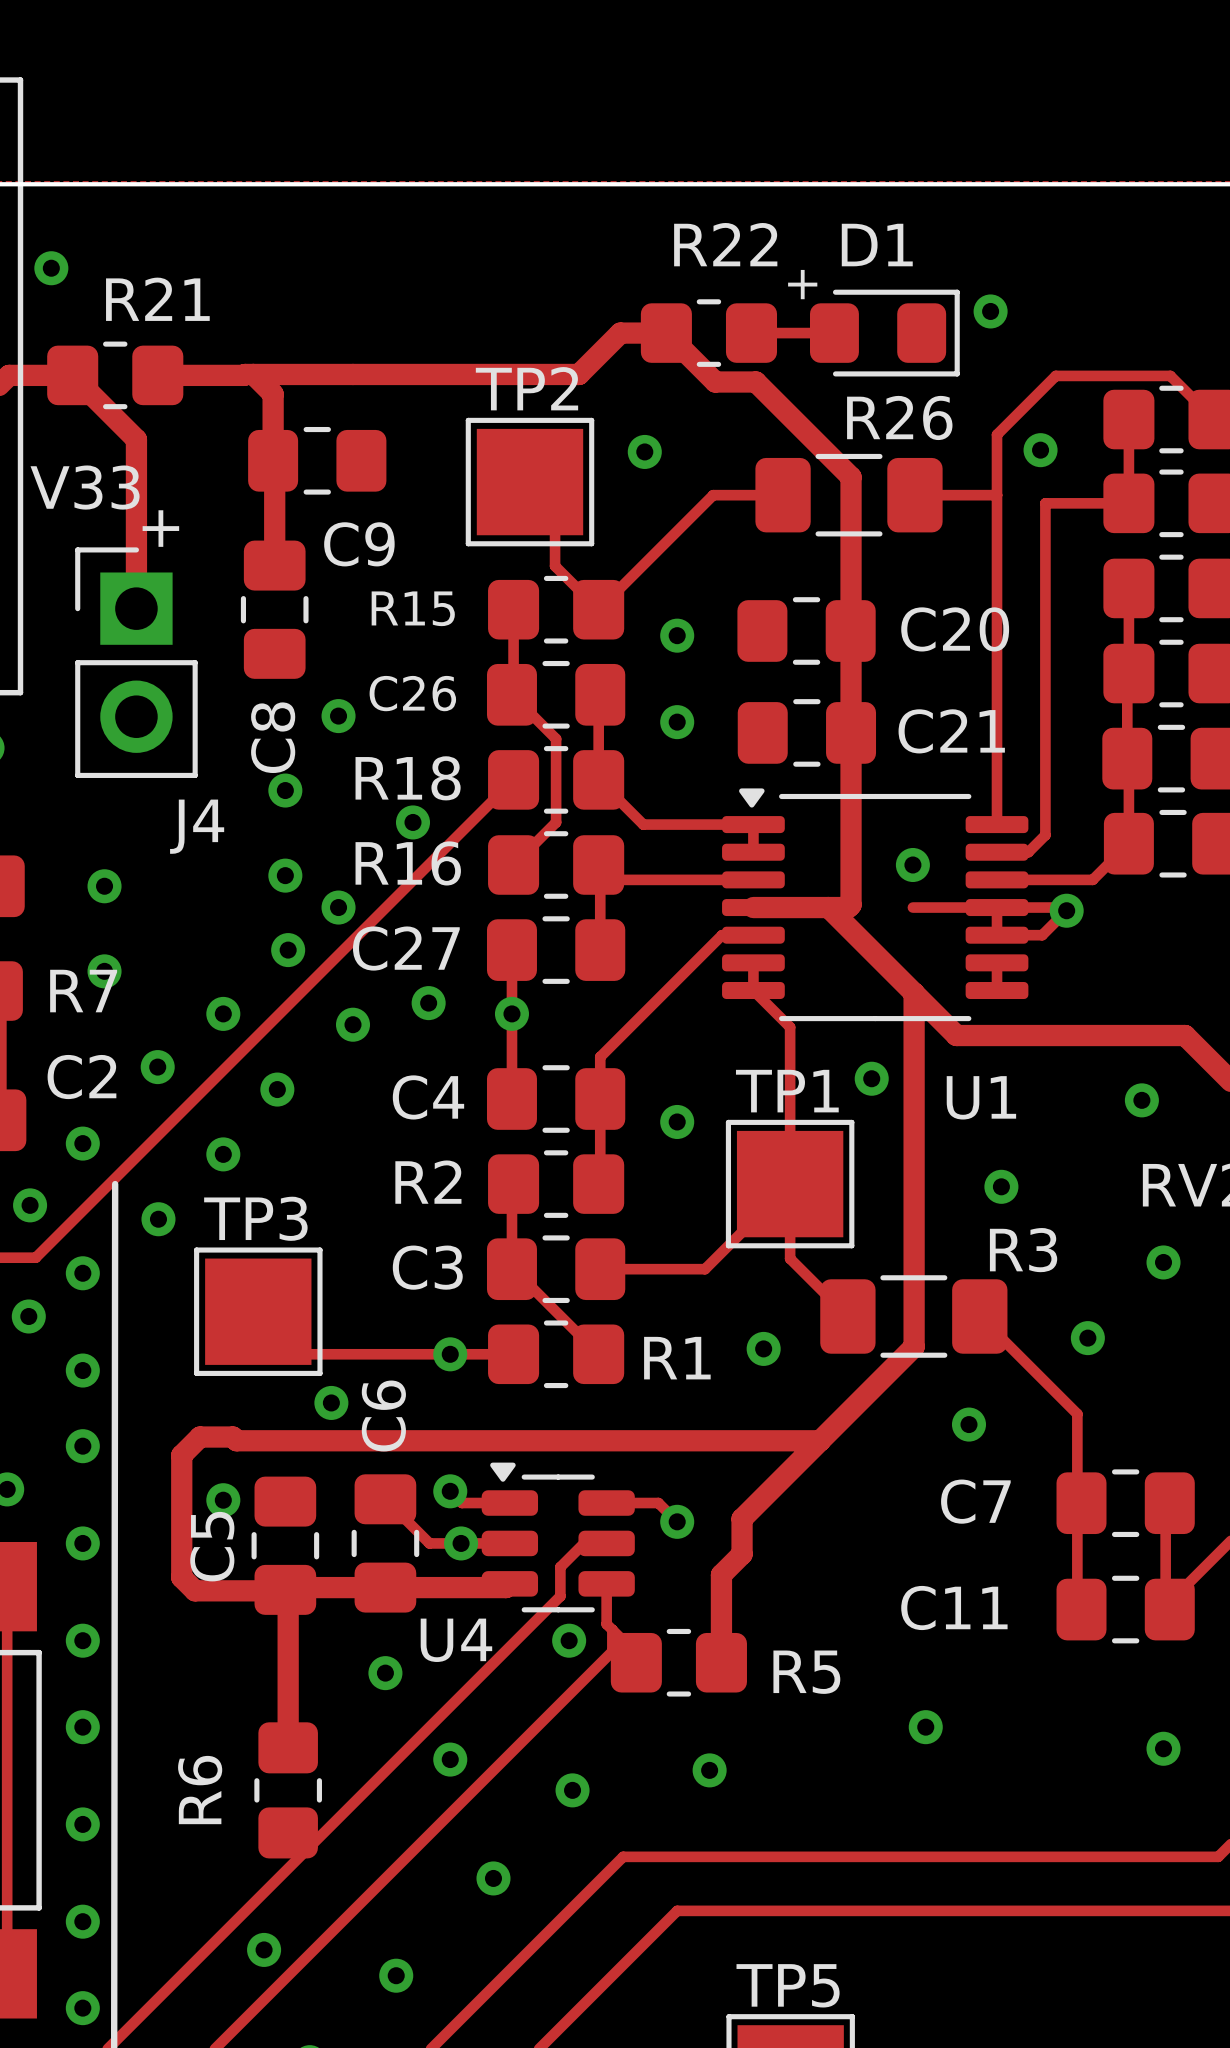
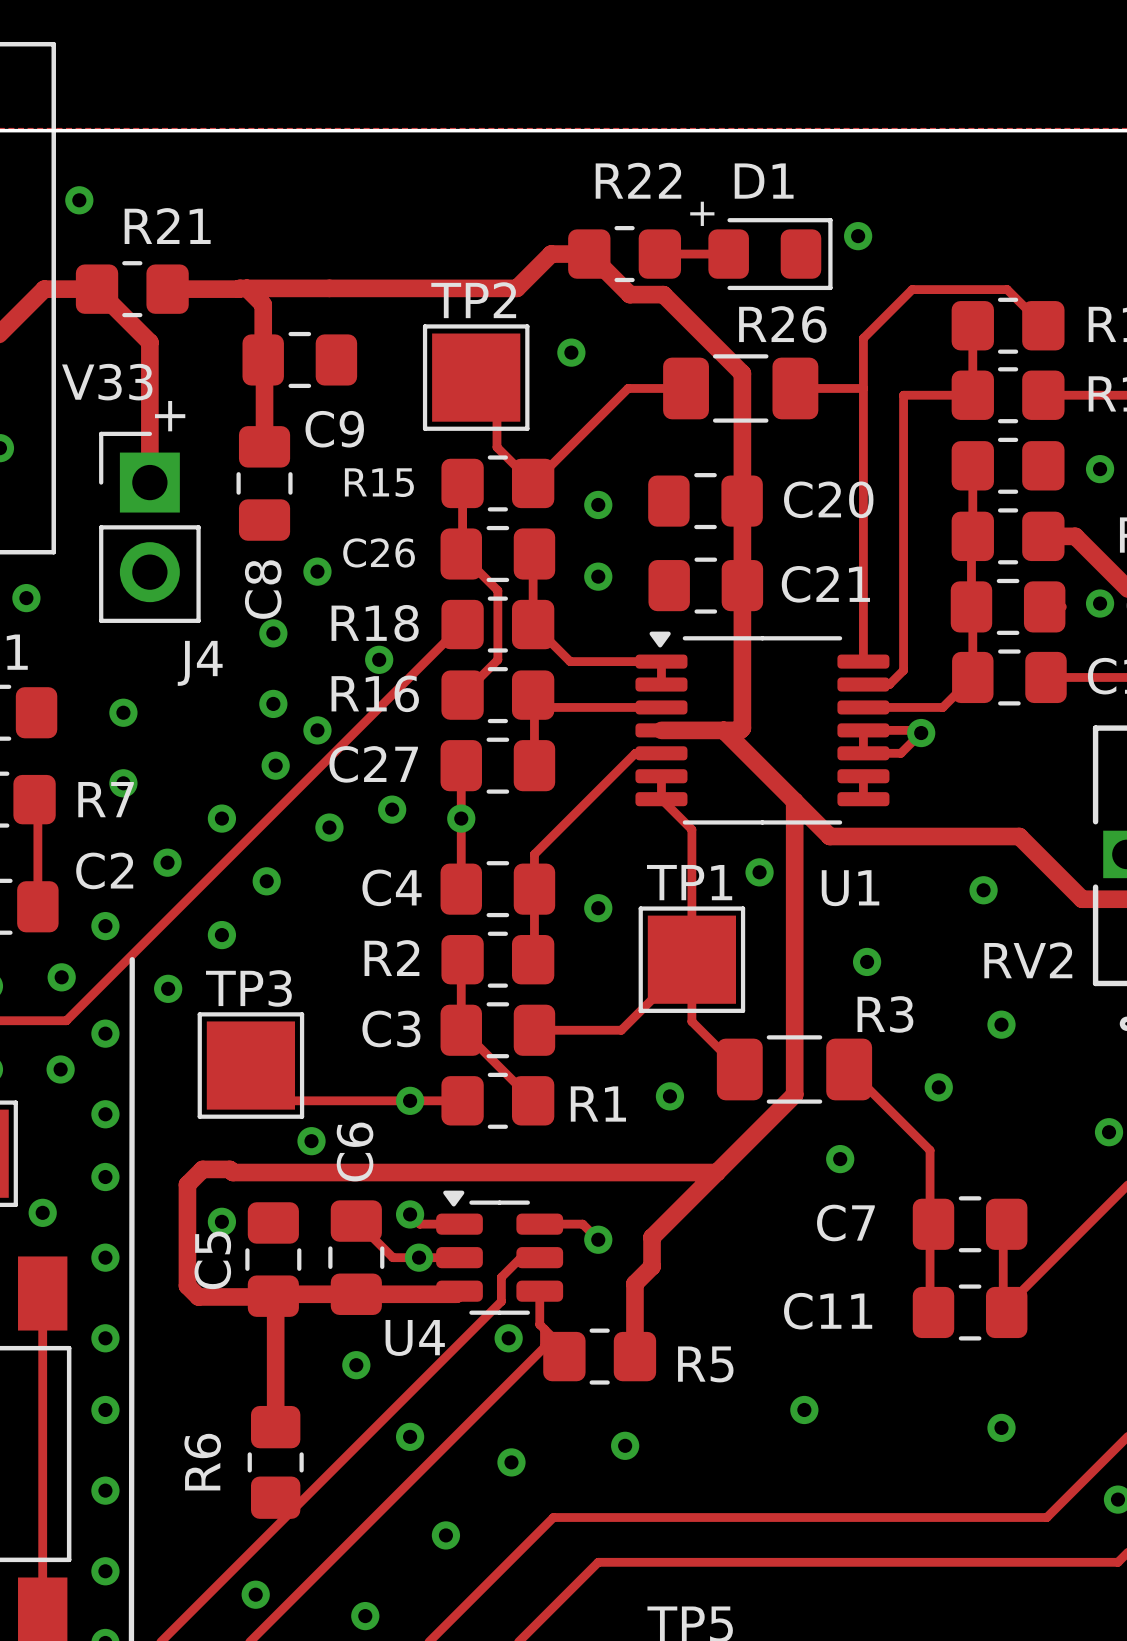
via: (1040, 450) -> none
via: (912, 864) -> none
track: (912, 907) (997, 907) -> none

